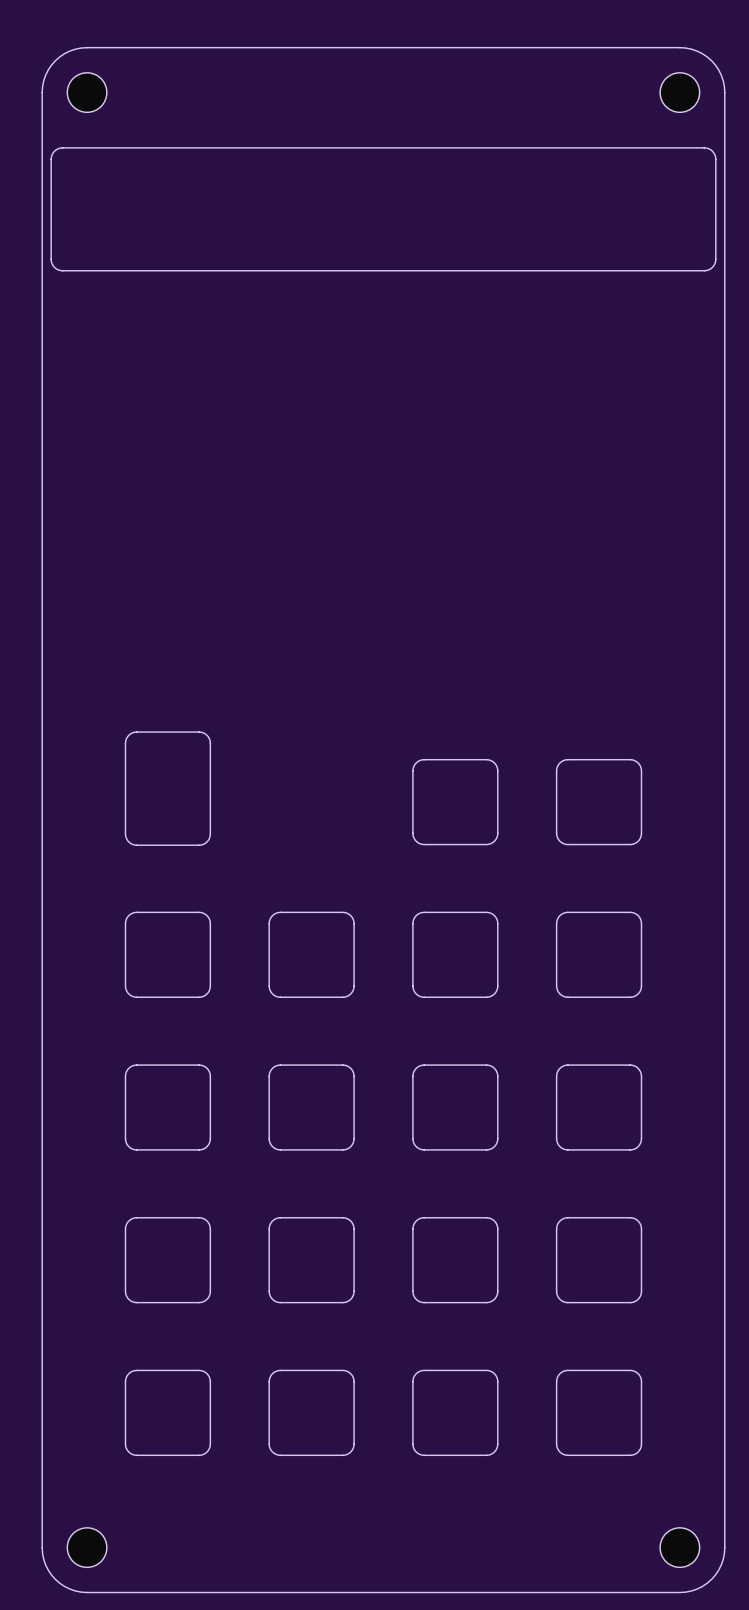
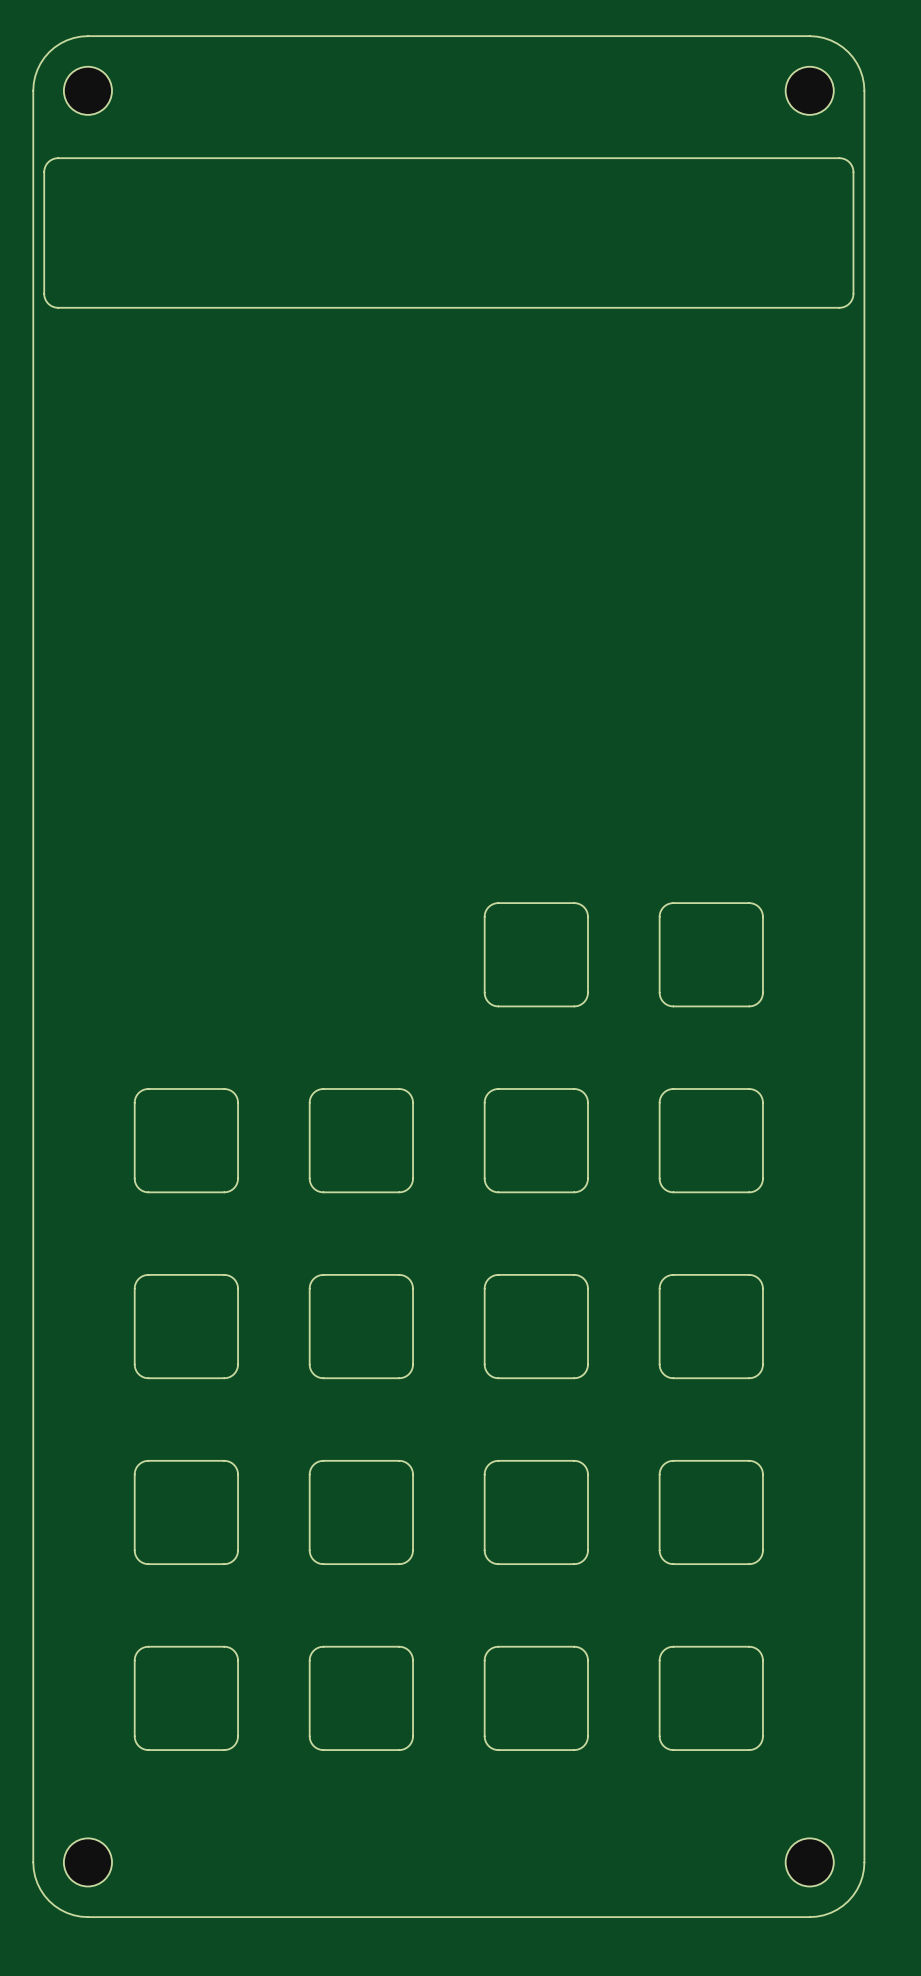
drawing: [125, 732, 211, 846] -> none

